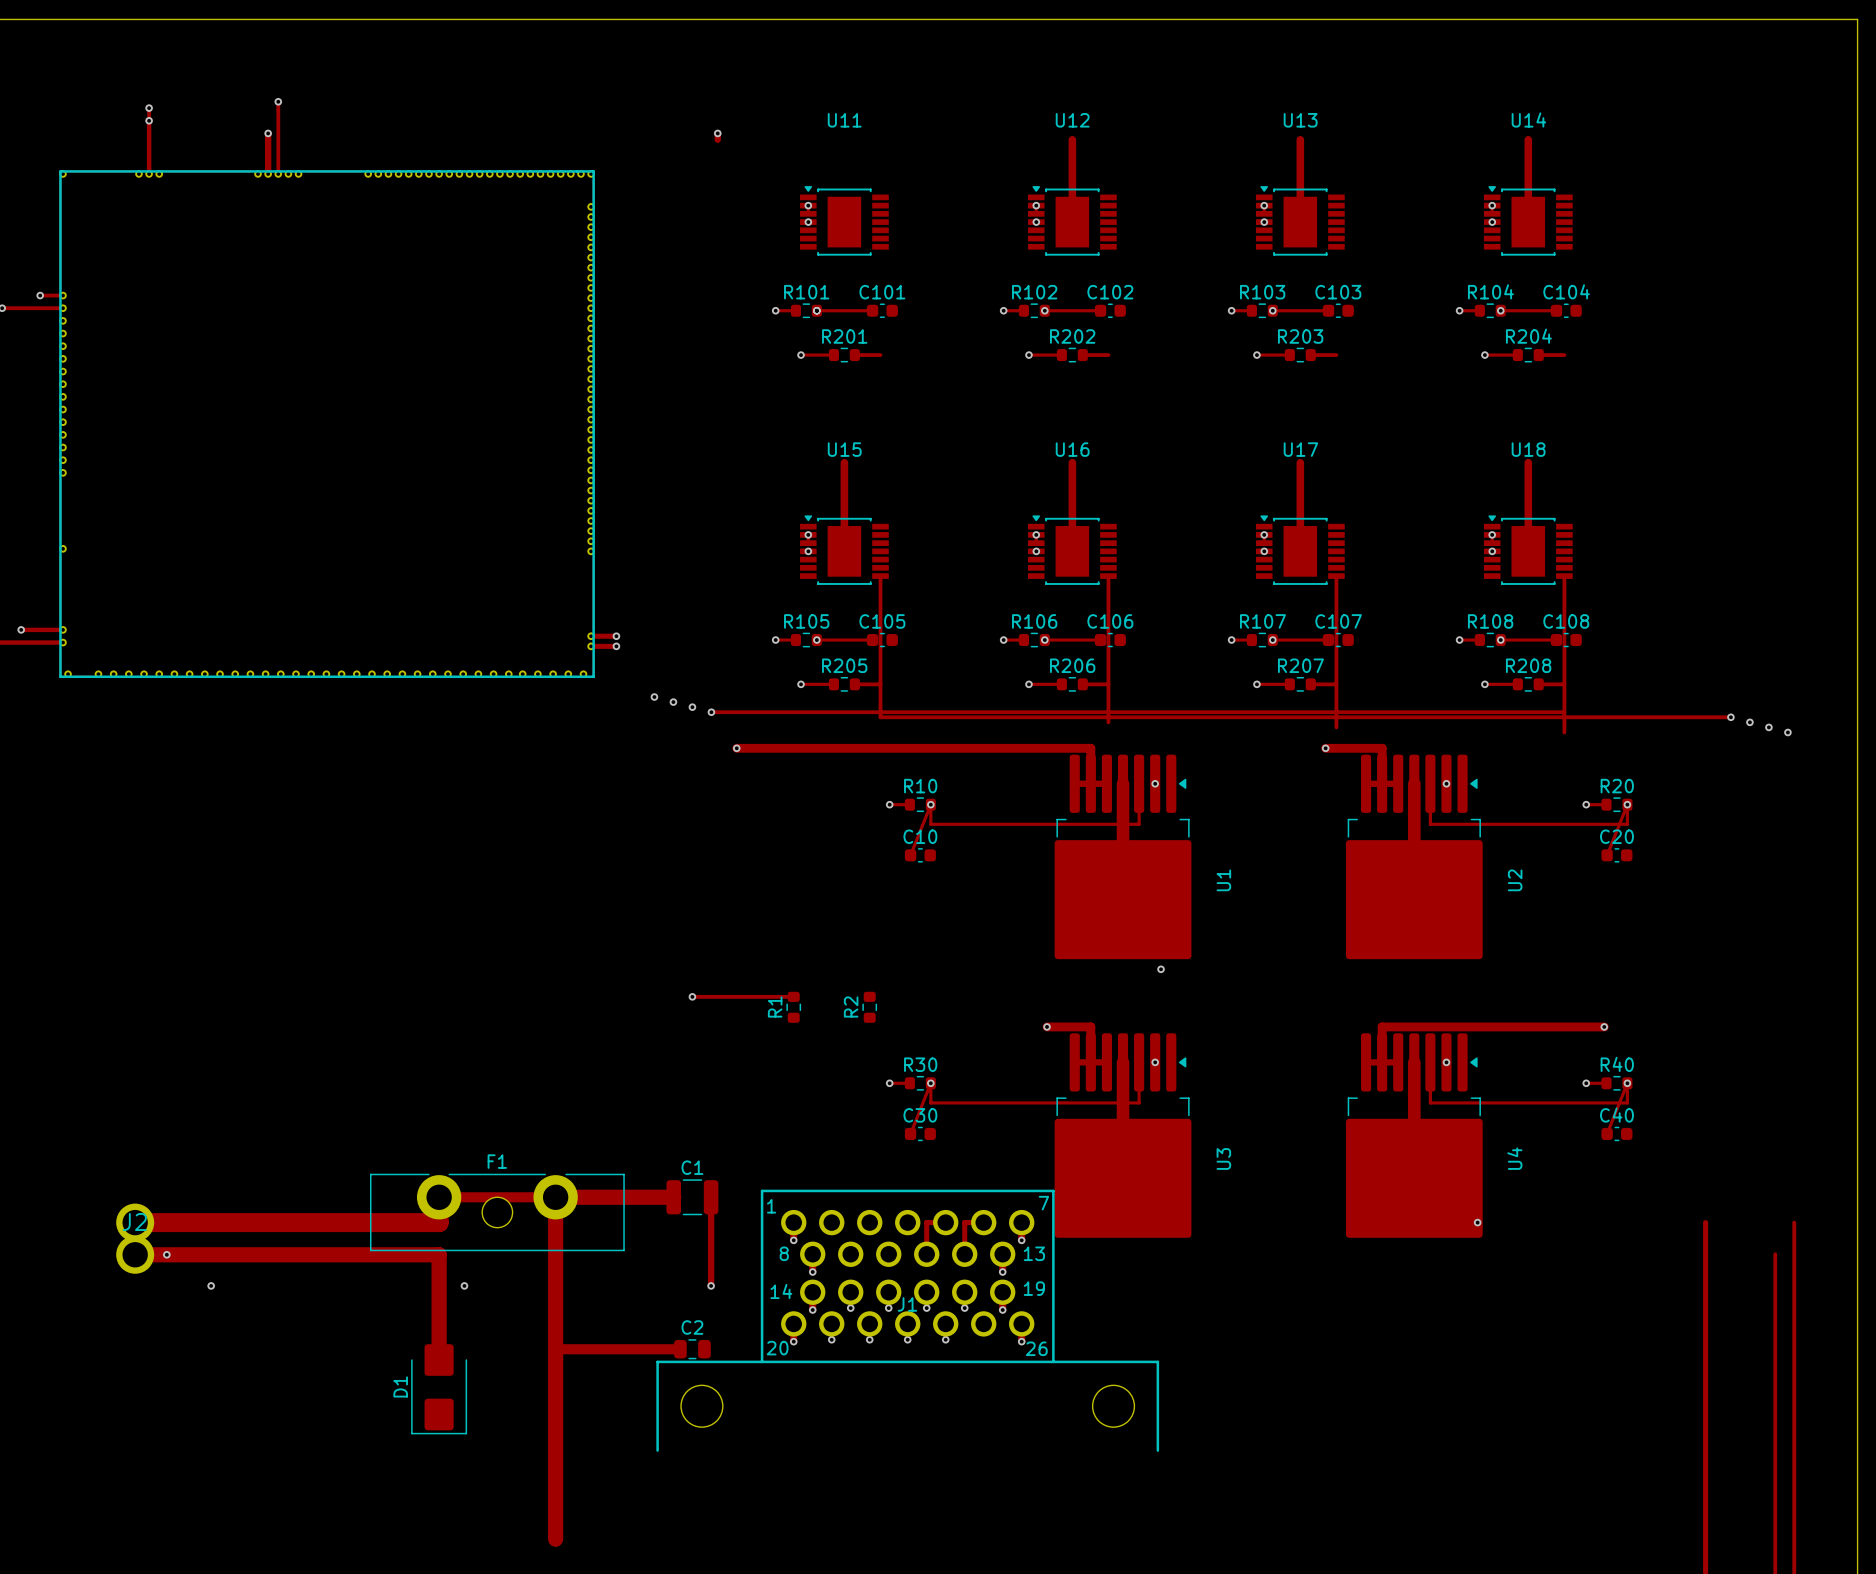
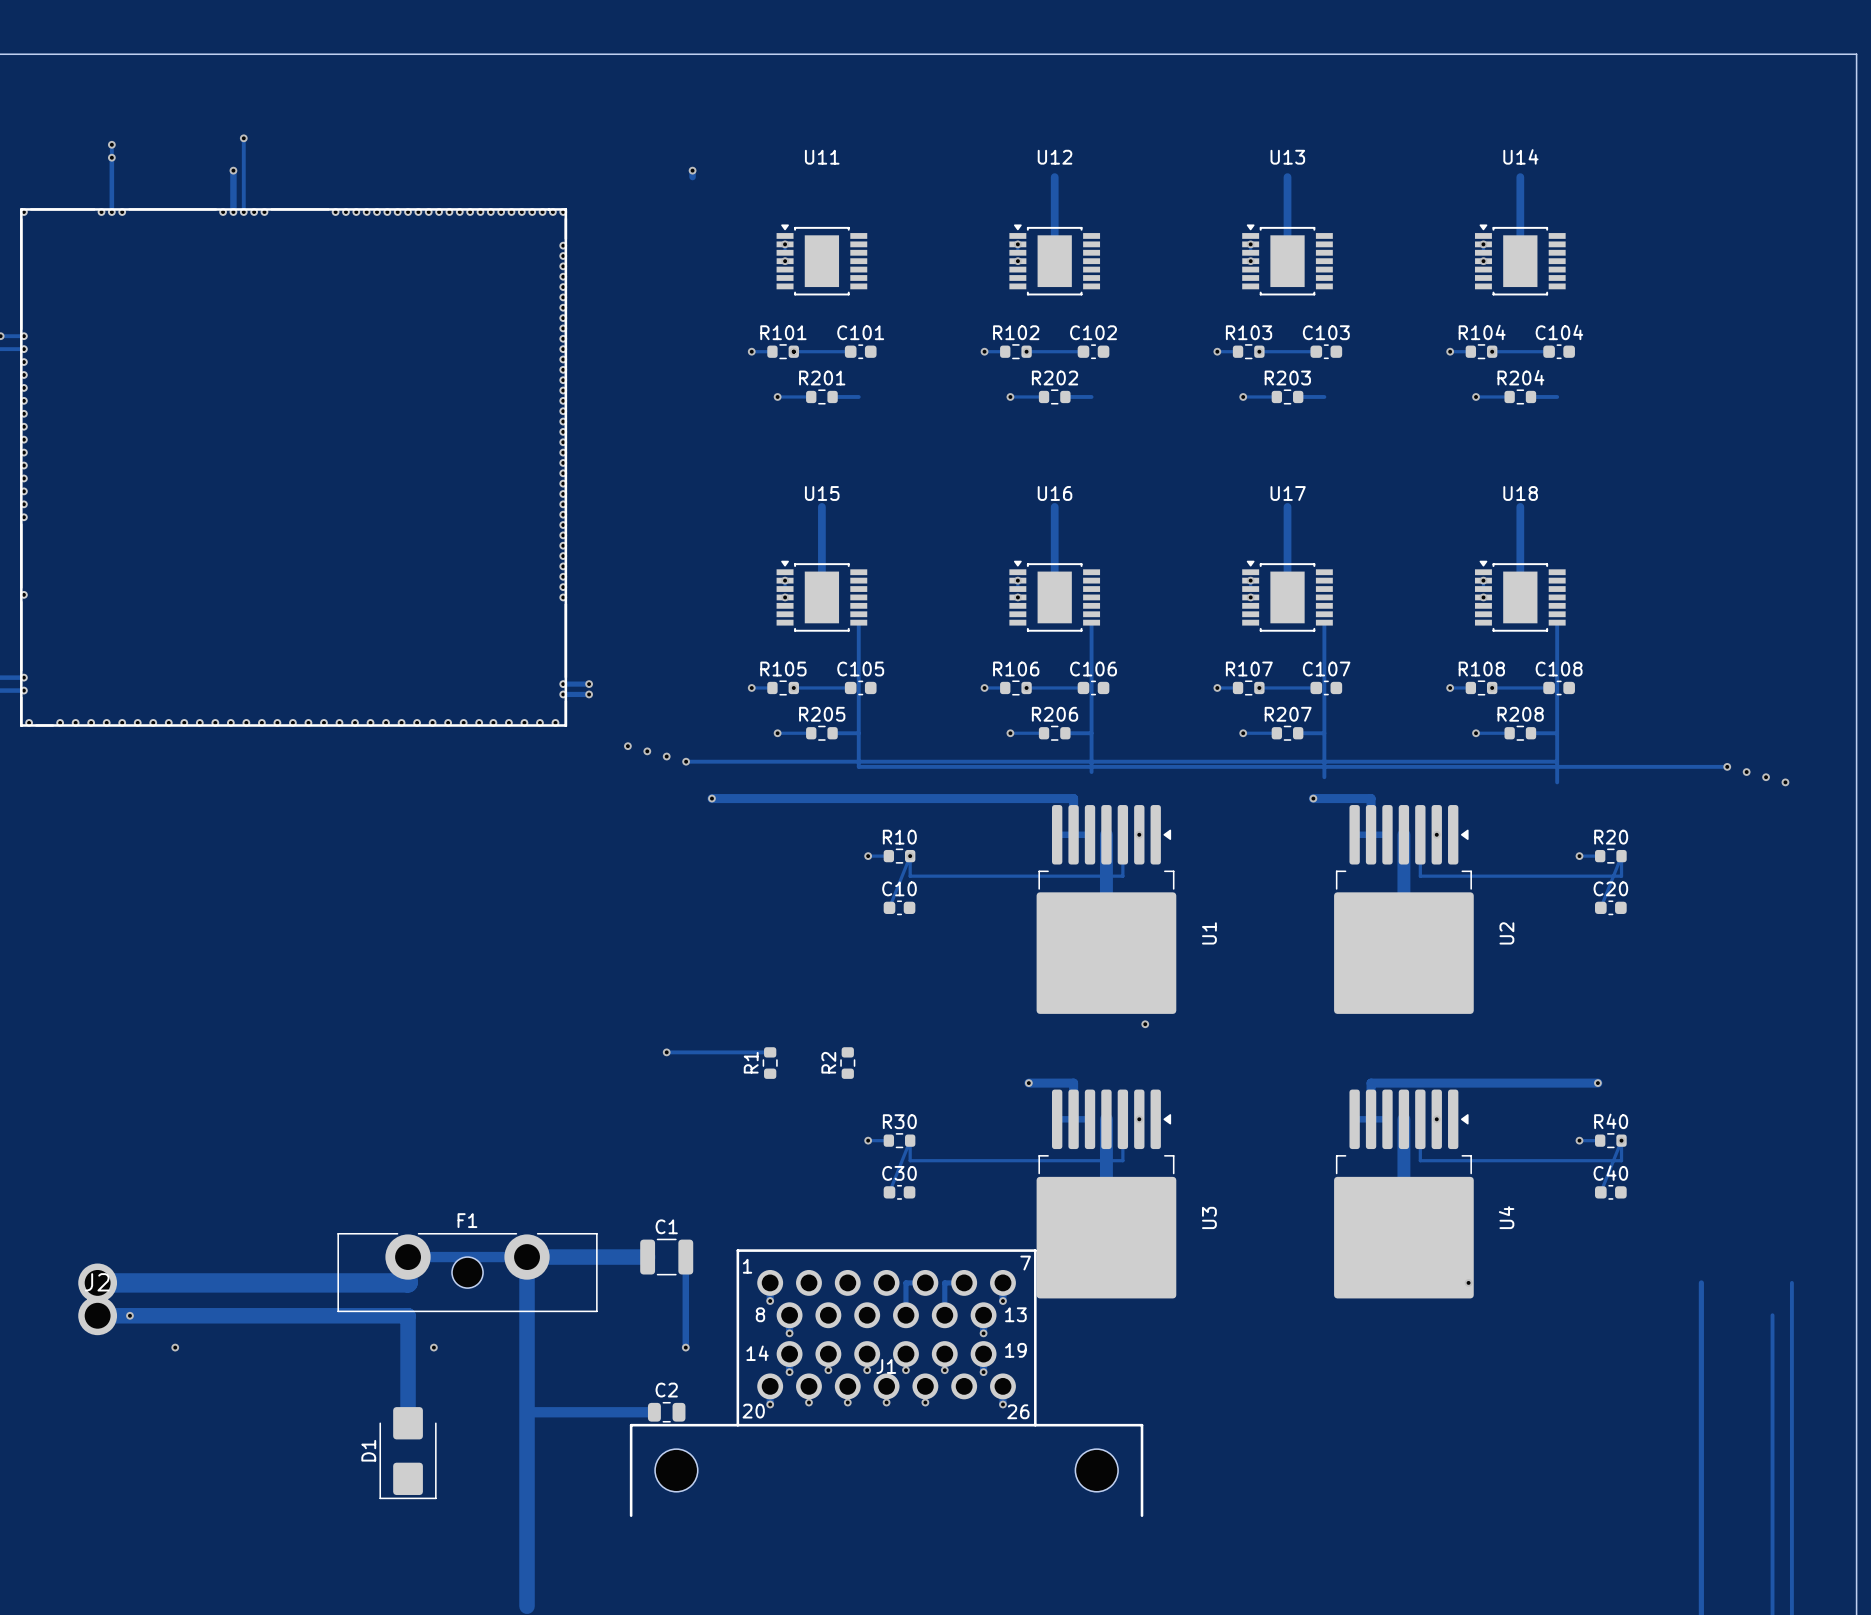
via: (1627, 804) -> none
via: (930, 1083) -> none

